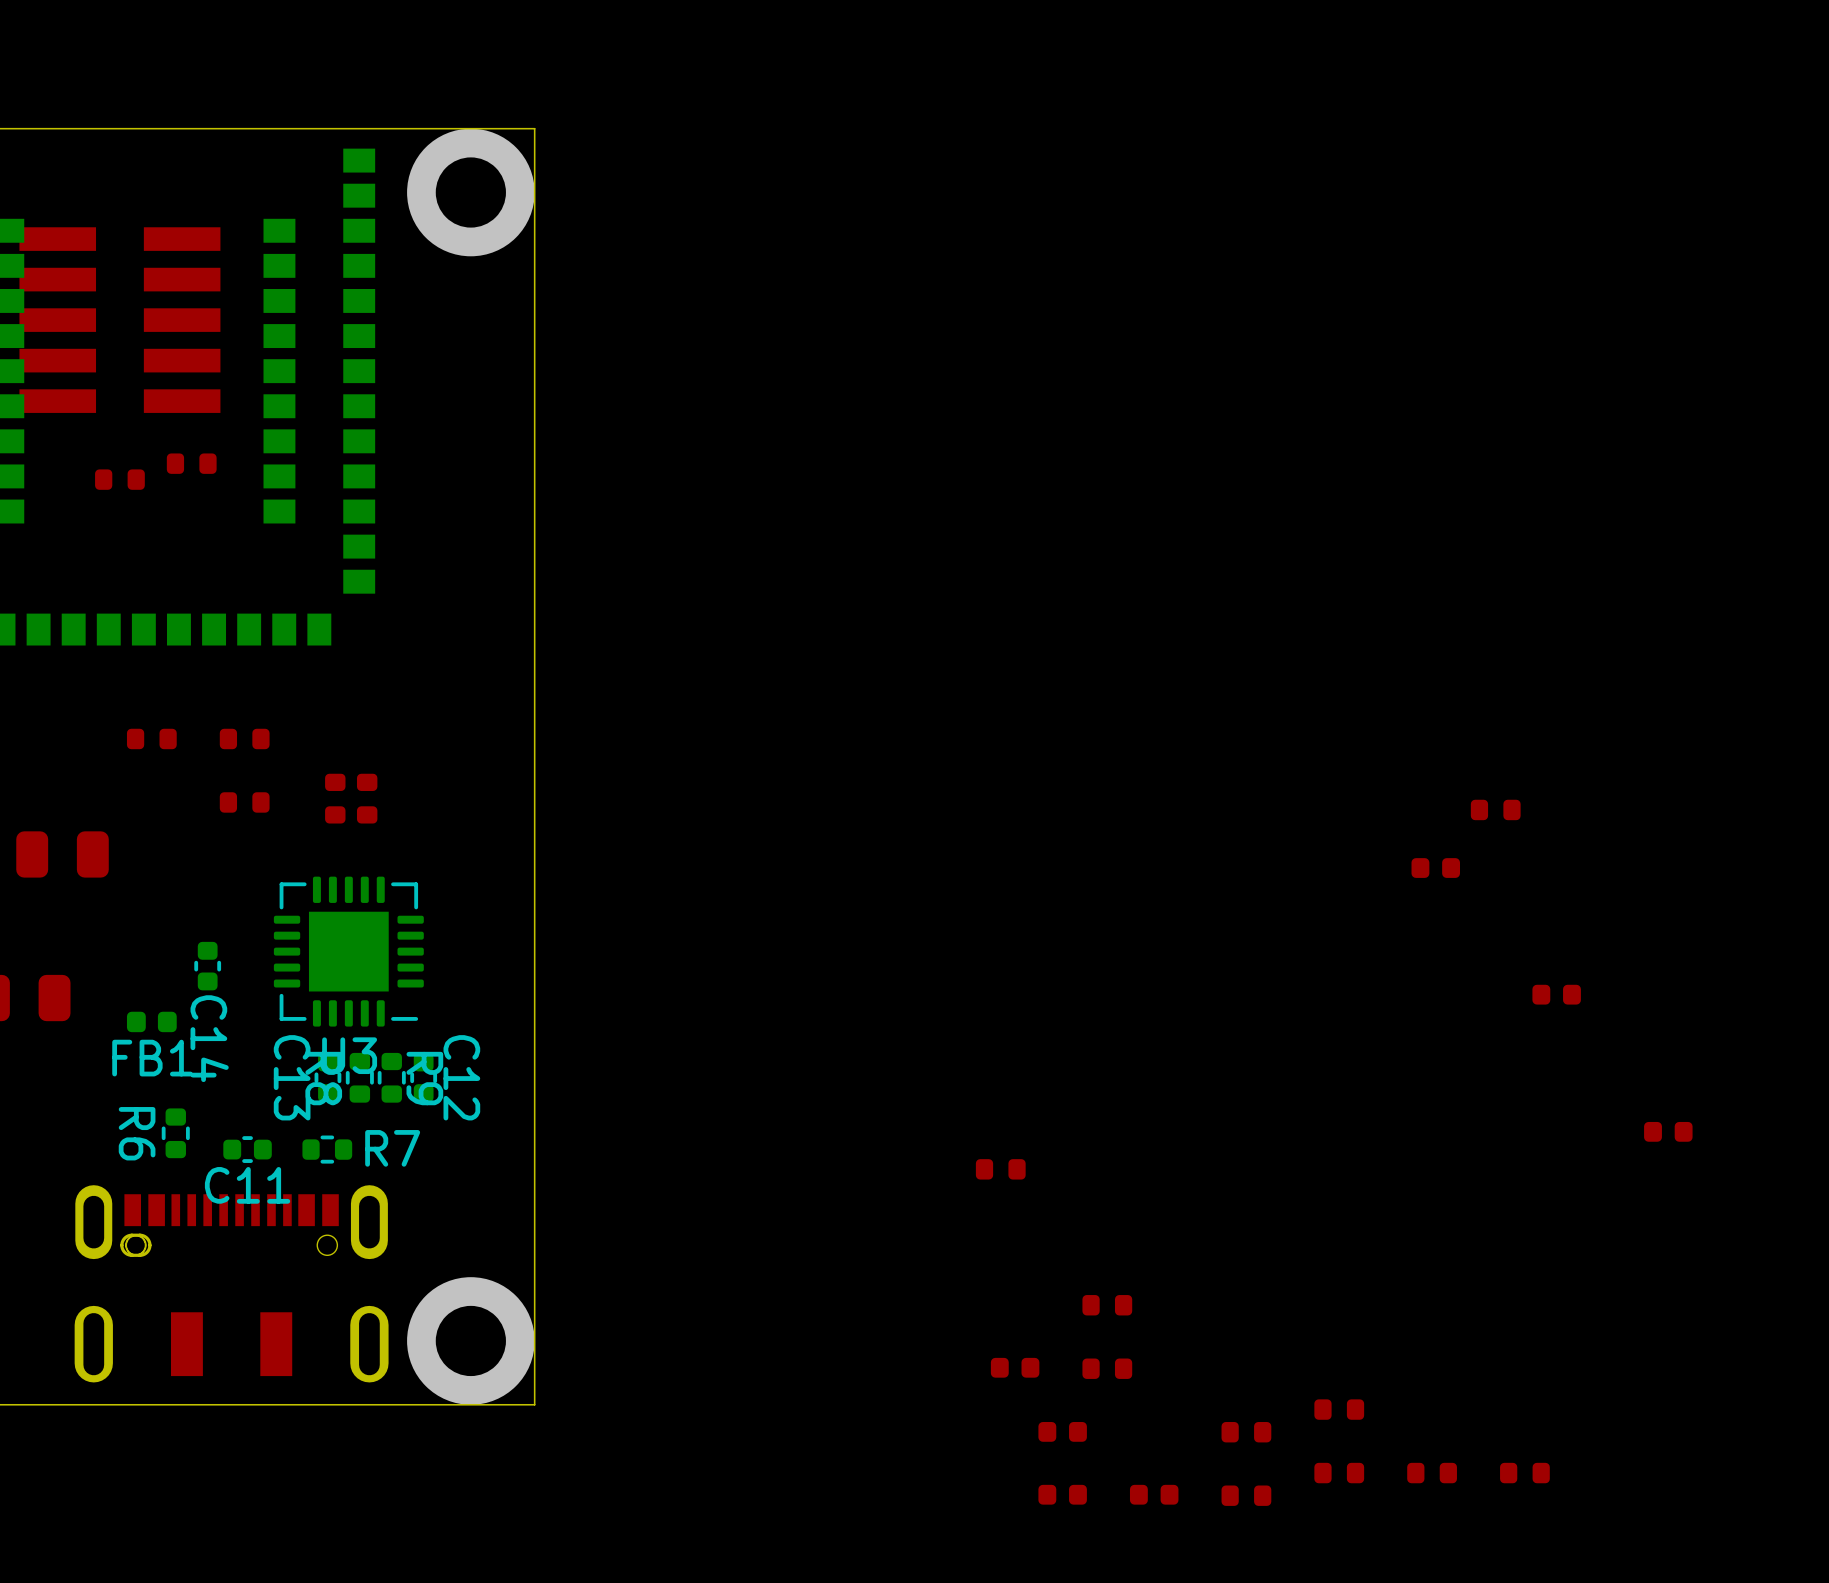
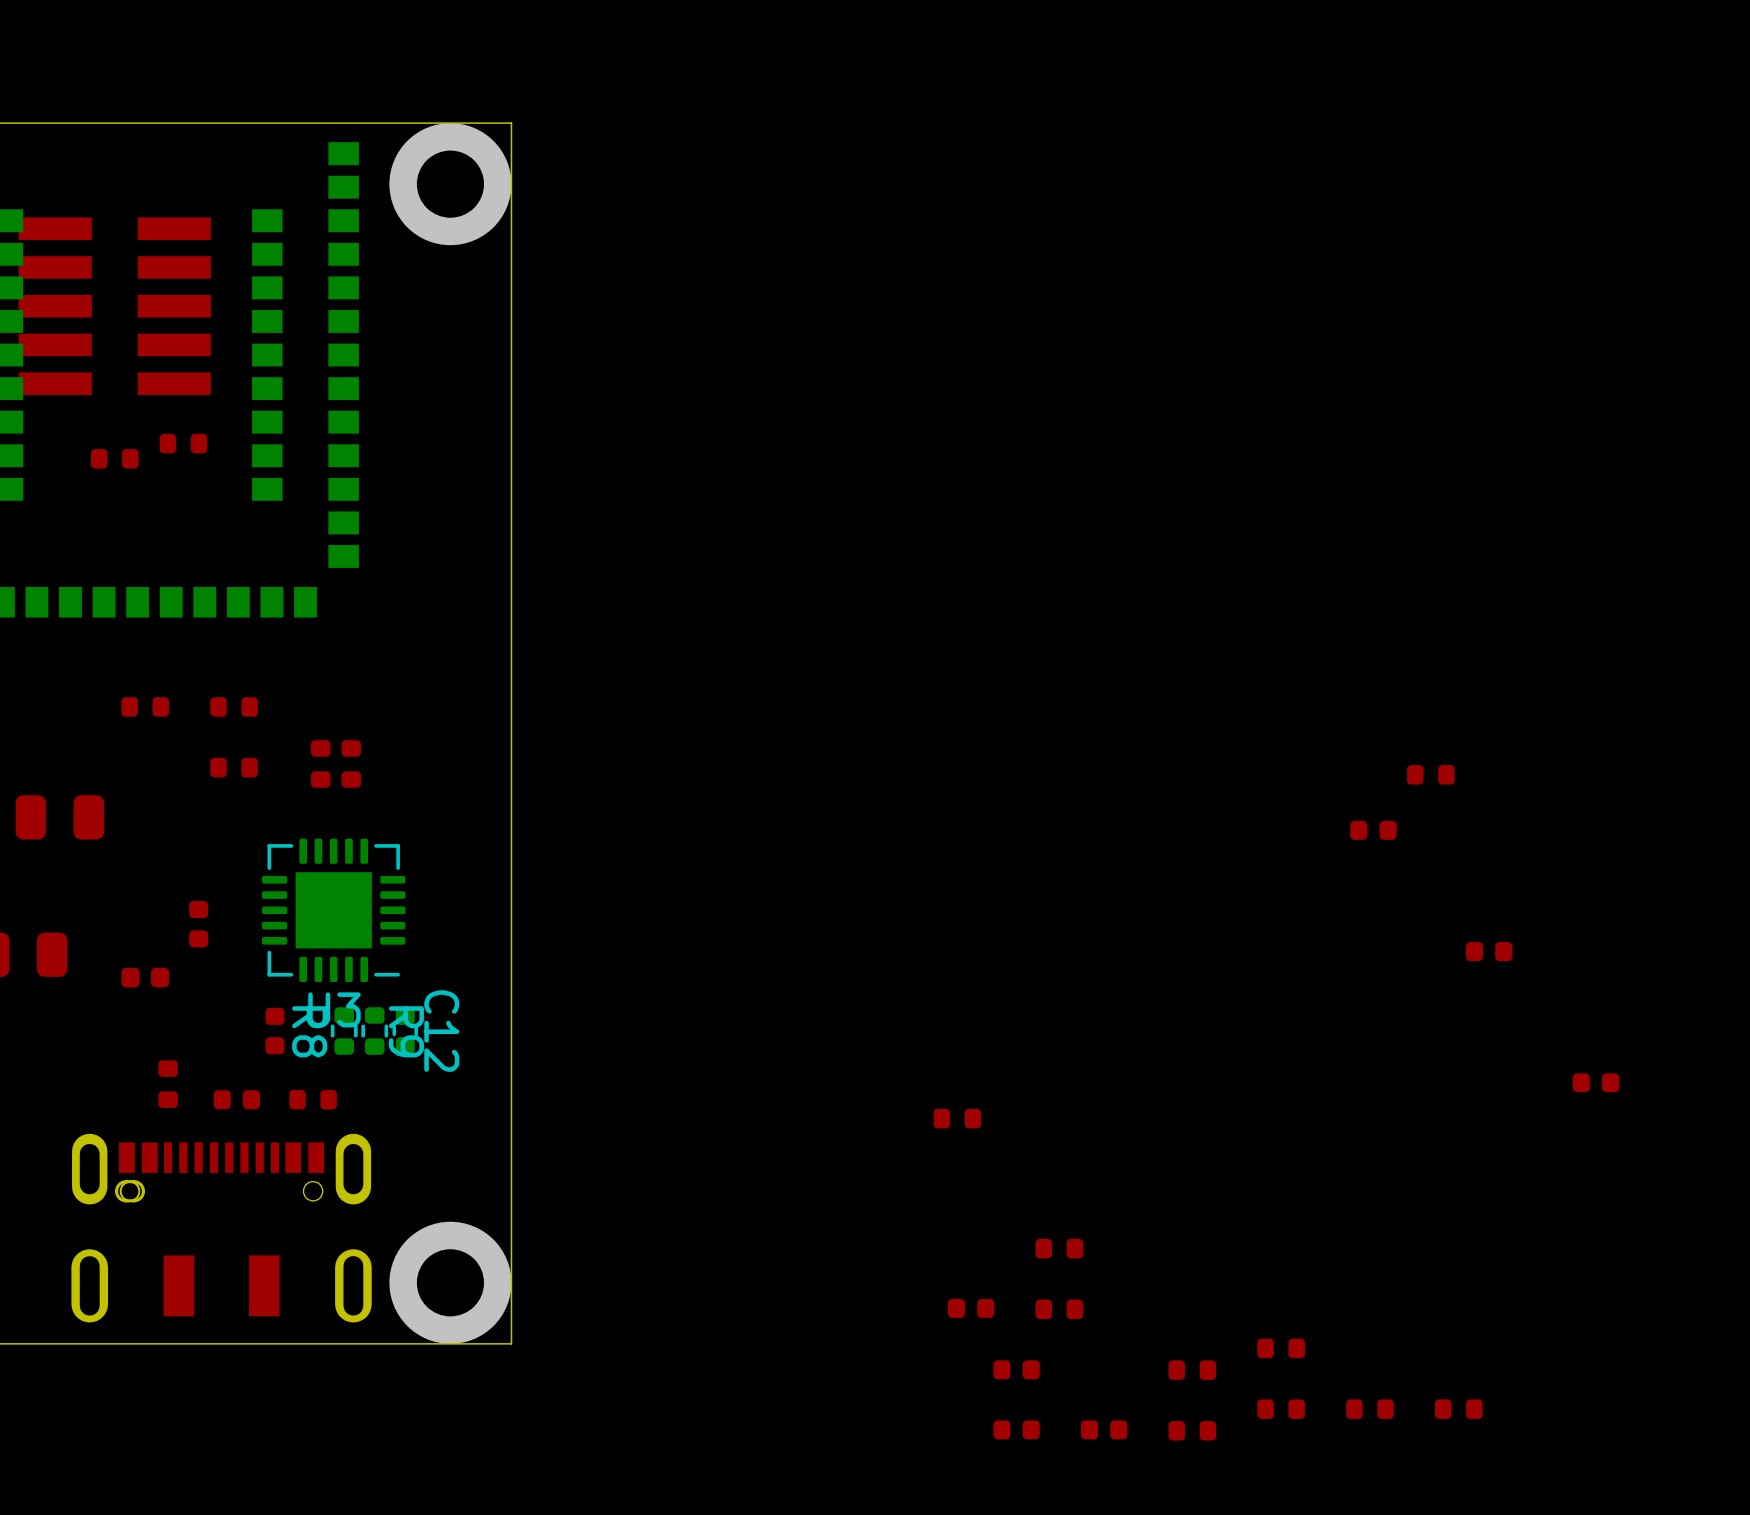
C14 side: bottom (207, 966) -> top (198, 924)
FB1 side: bottom (151, 1021) -> top (145, 977)
C13 side: bottom (327, 1077) -> top (274, 1031)
R6 side: bottom (175, 1133) -> top (168, 1084)
C11 side: bottom (247, 1149) -> top (236, 1099)
R7 side: bottom (327, 1149) -> top (313, 1099)

